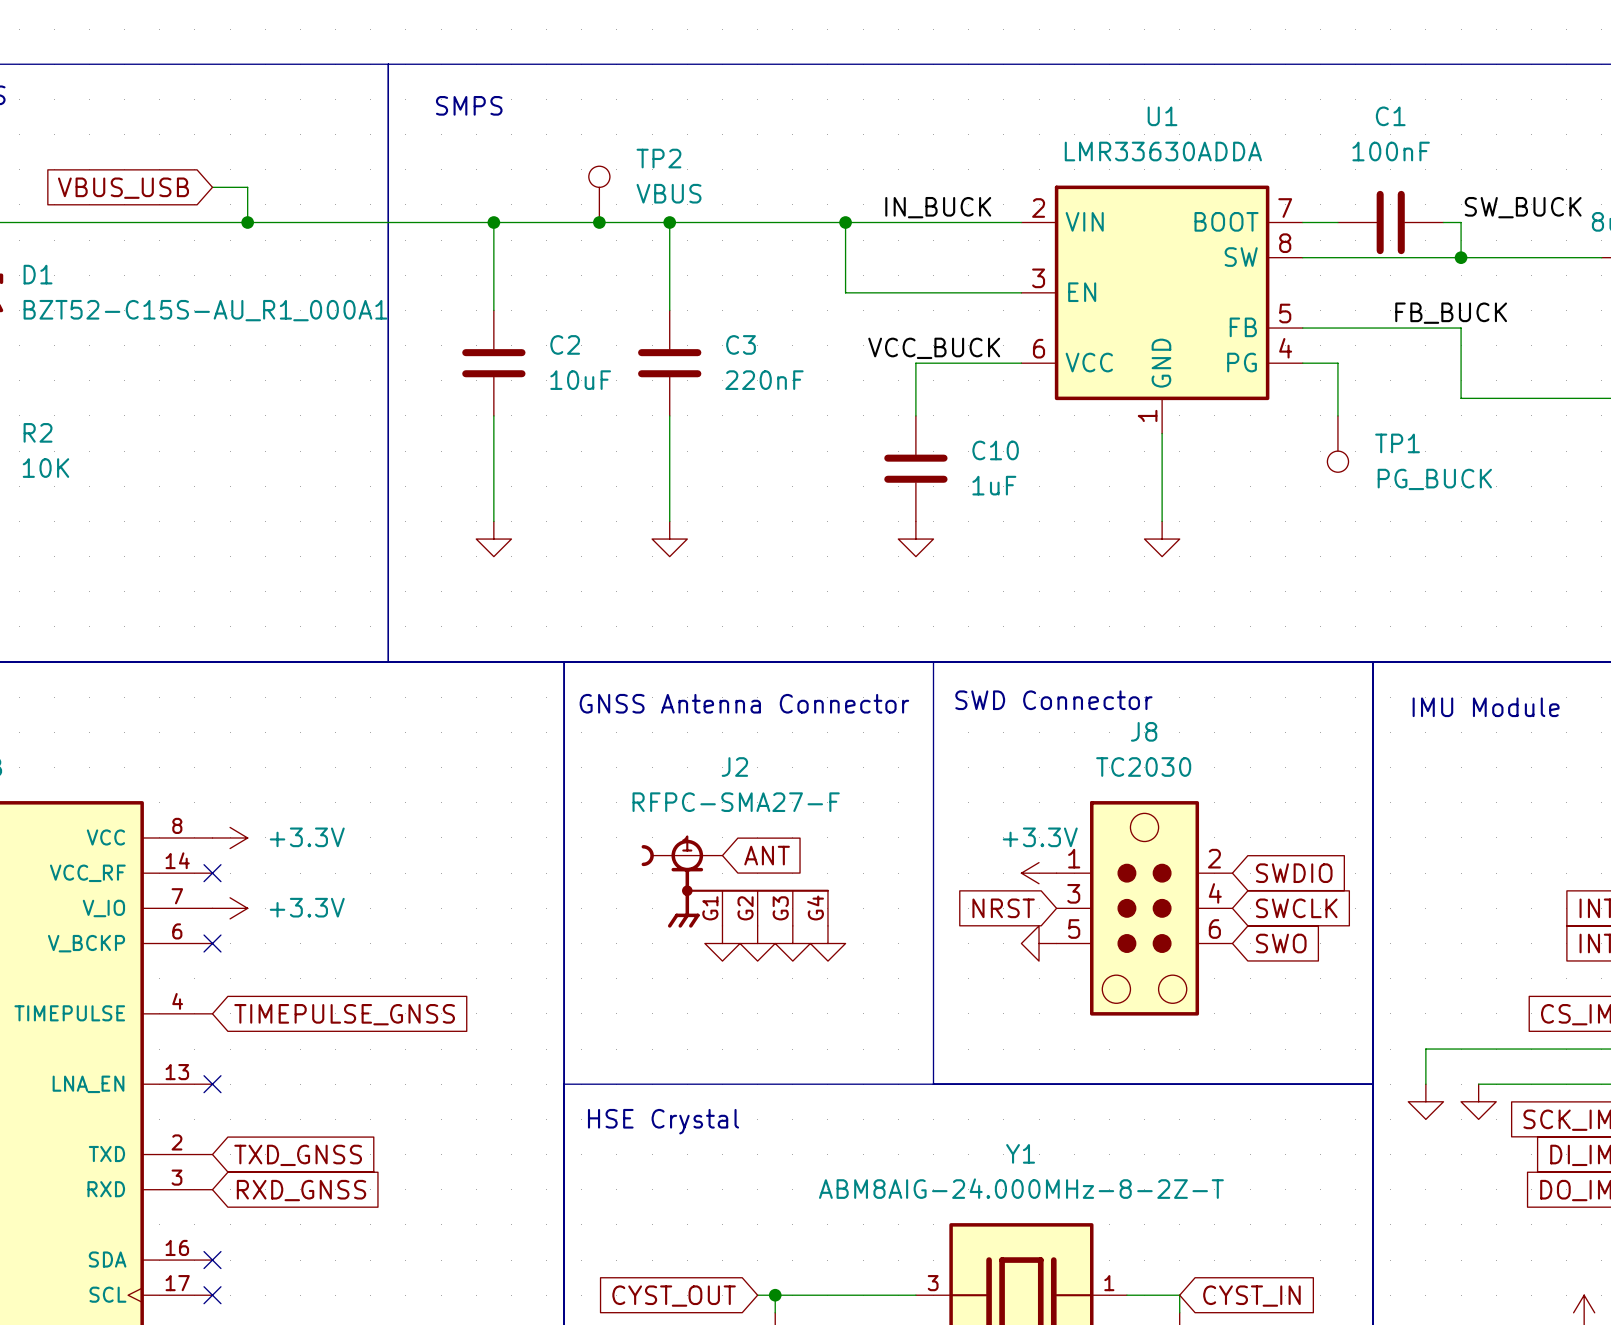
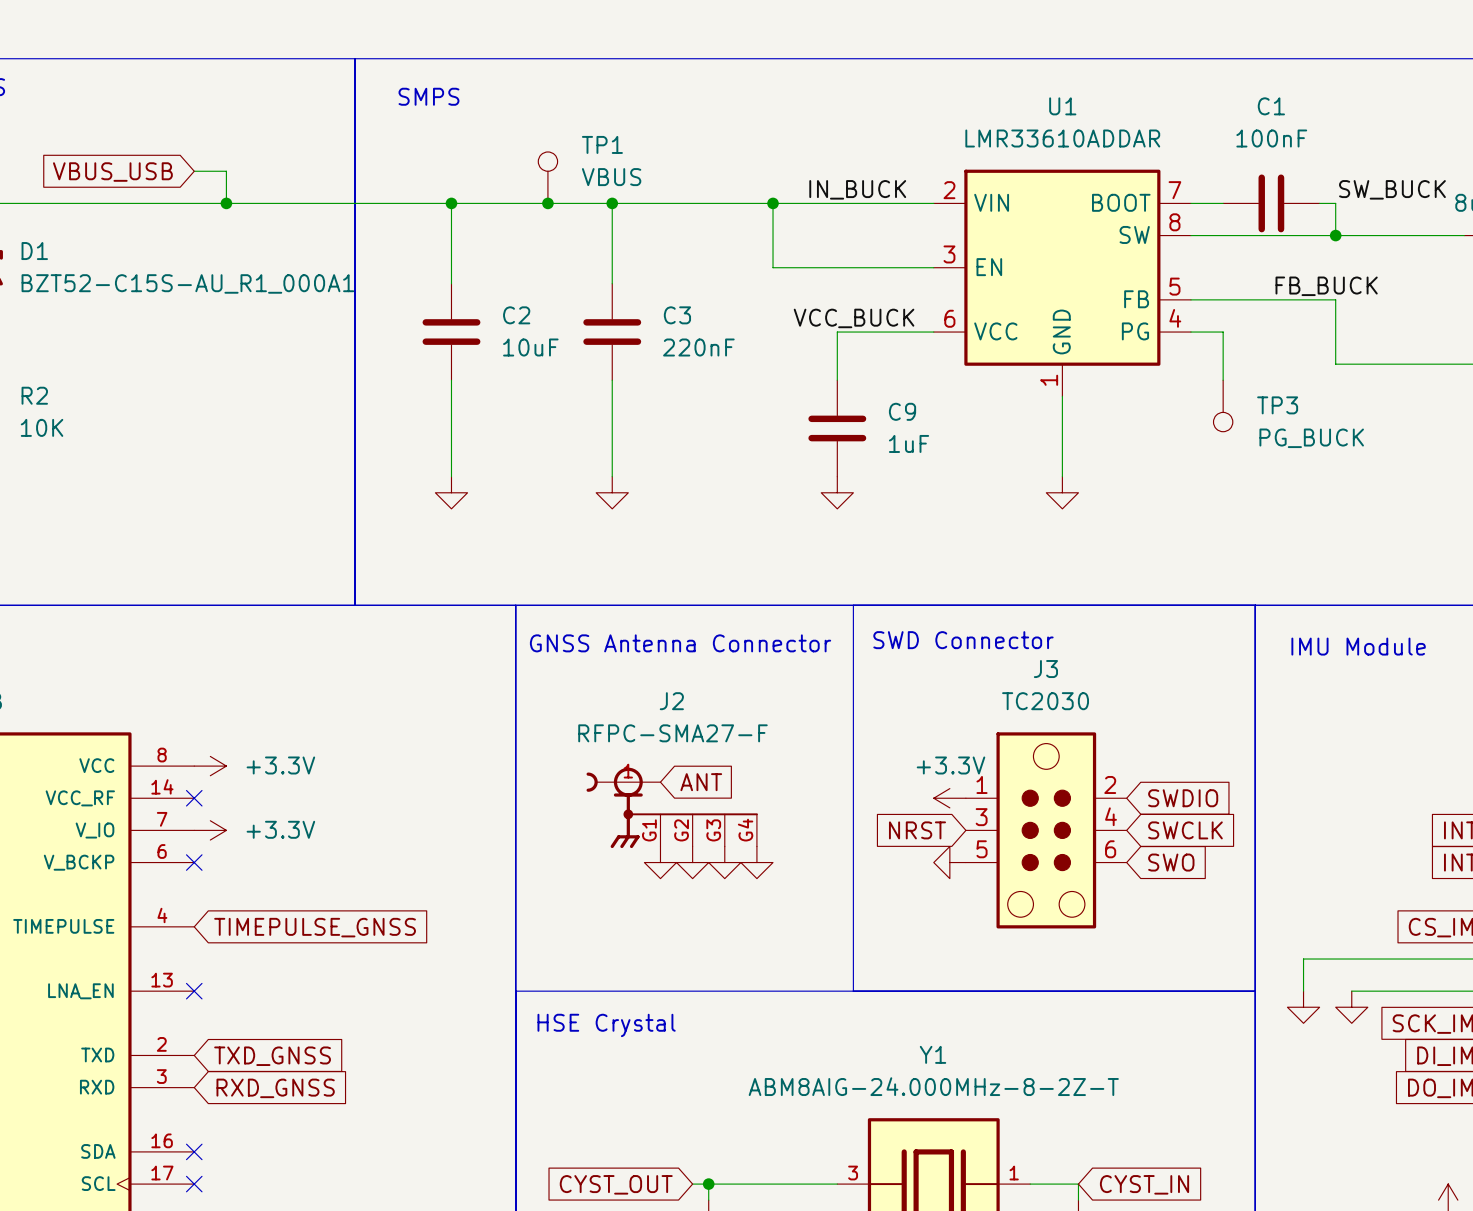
U1 value: LMR33630ADDA (1163, 151) -> LMR33610ADDAR (1062, 138)
TP2 name: TP2 (658, 158) -> TP1 (602, 144)
TP1 name: TP1 (1397, 443) -> TP3 (1277, 405)
C10 name: C10 (995, 450) -> C9 (902, 411)
J8 name: J8 (1144, 731) -> J3 (1045, 669)

